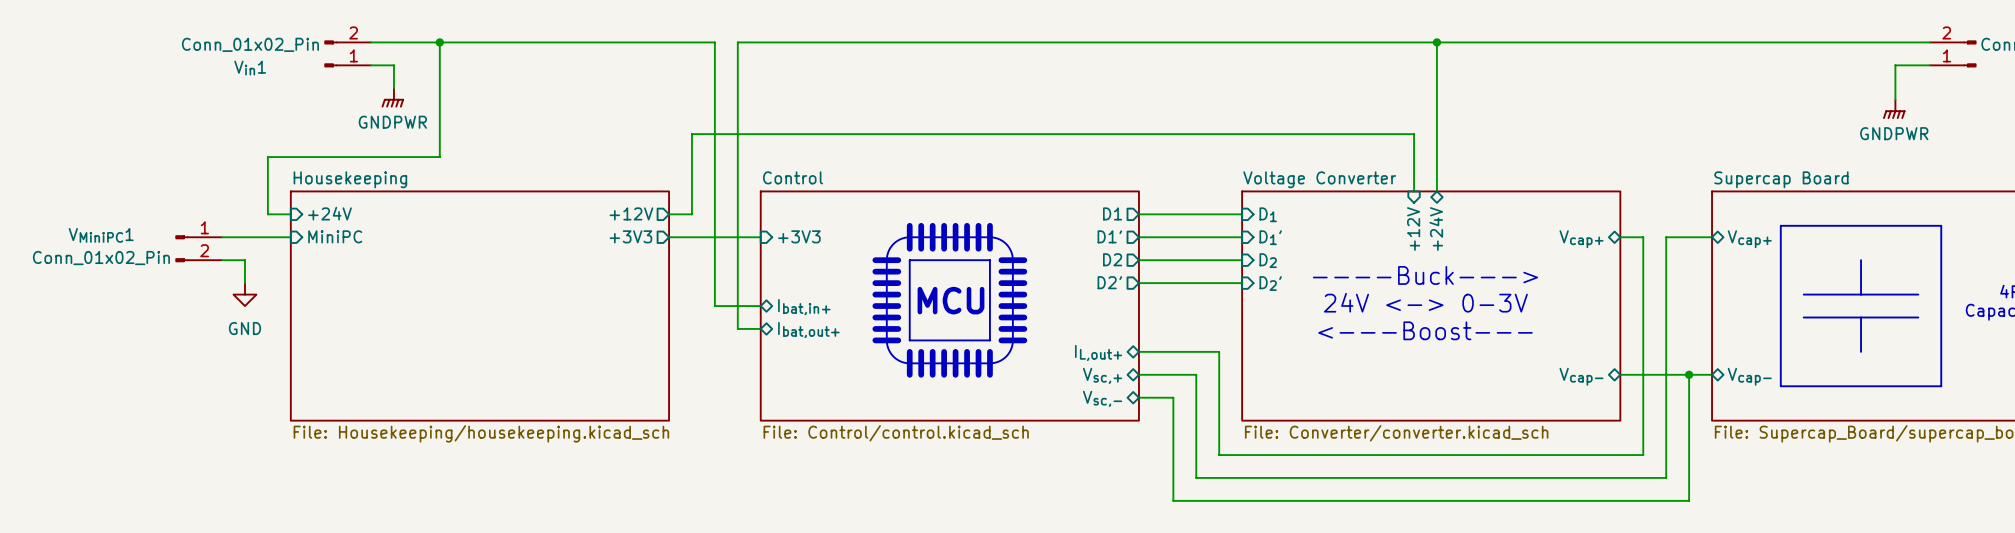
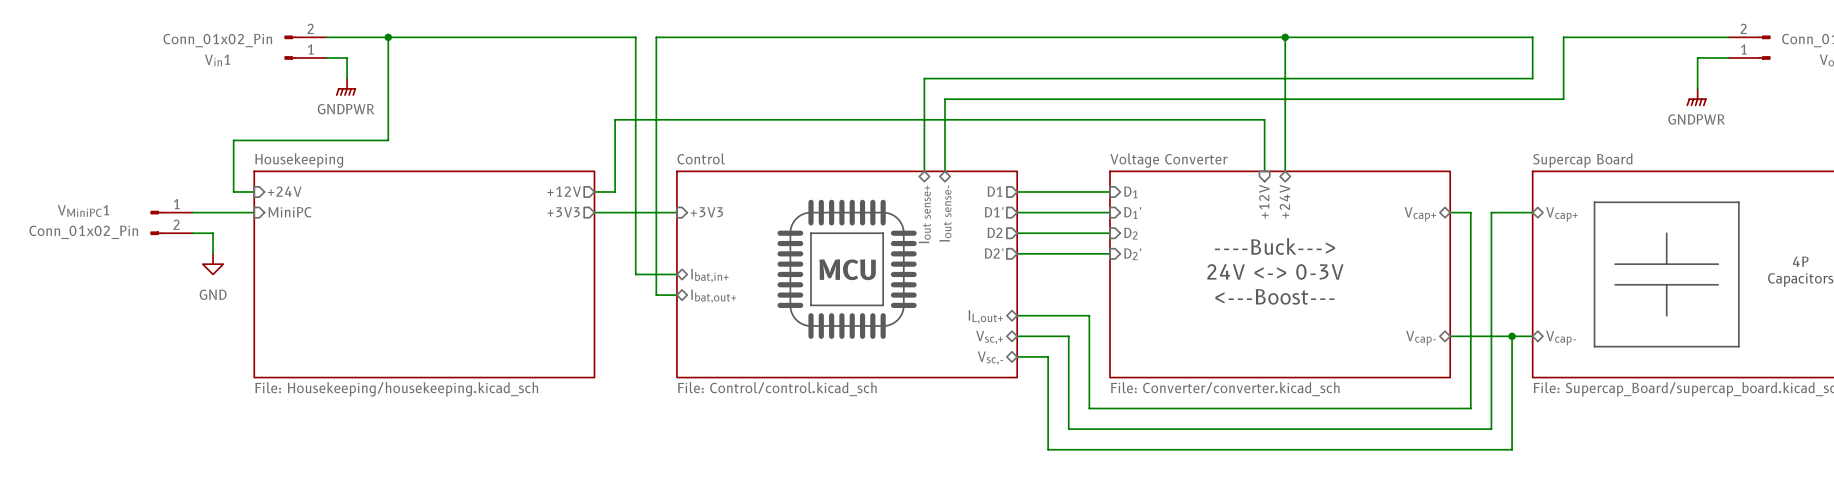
wire: (1712, 42) (1746, 42) -> (945, 171) (945, 99) (1563, 99) (1563, 37)
wire: none -> (1532, 37) (1532, 78) (924, 78) (924, 171)
sheet pin: none -> Iout sense+ (924, 214)
sheet pin: none -> Iout sense- (945, 213)

